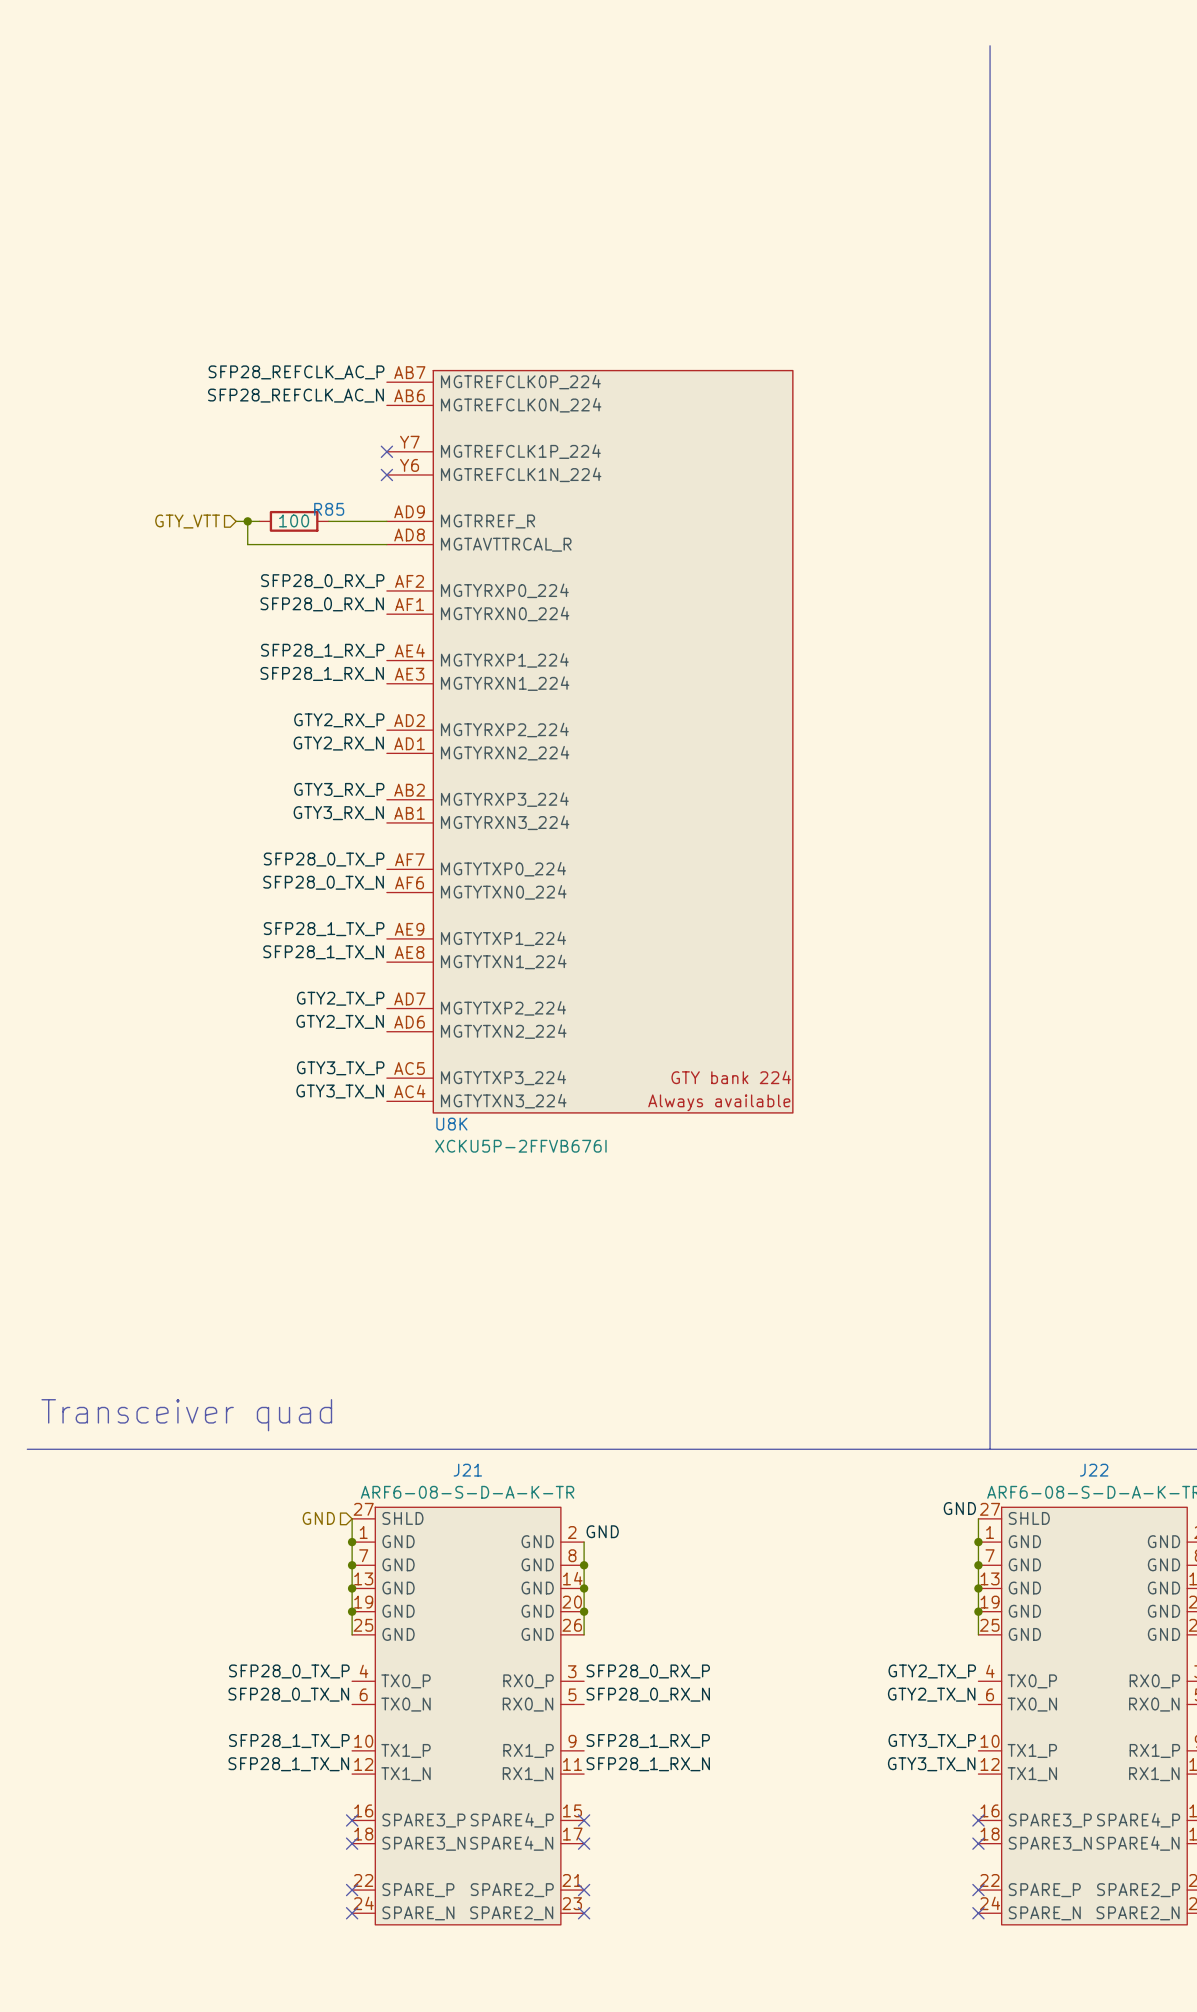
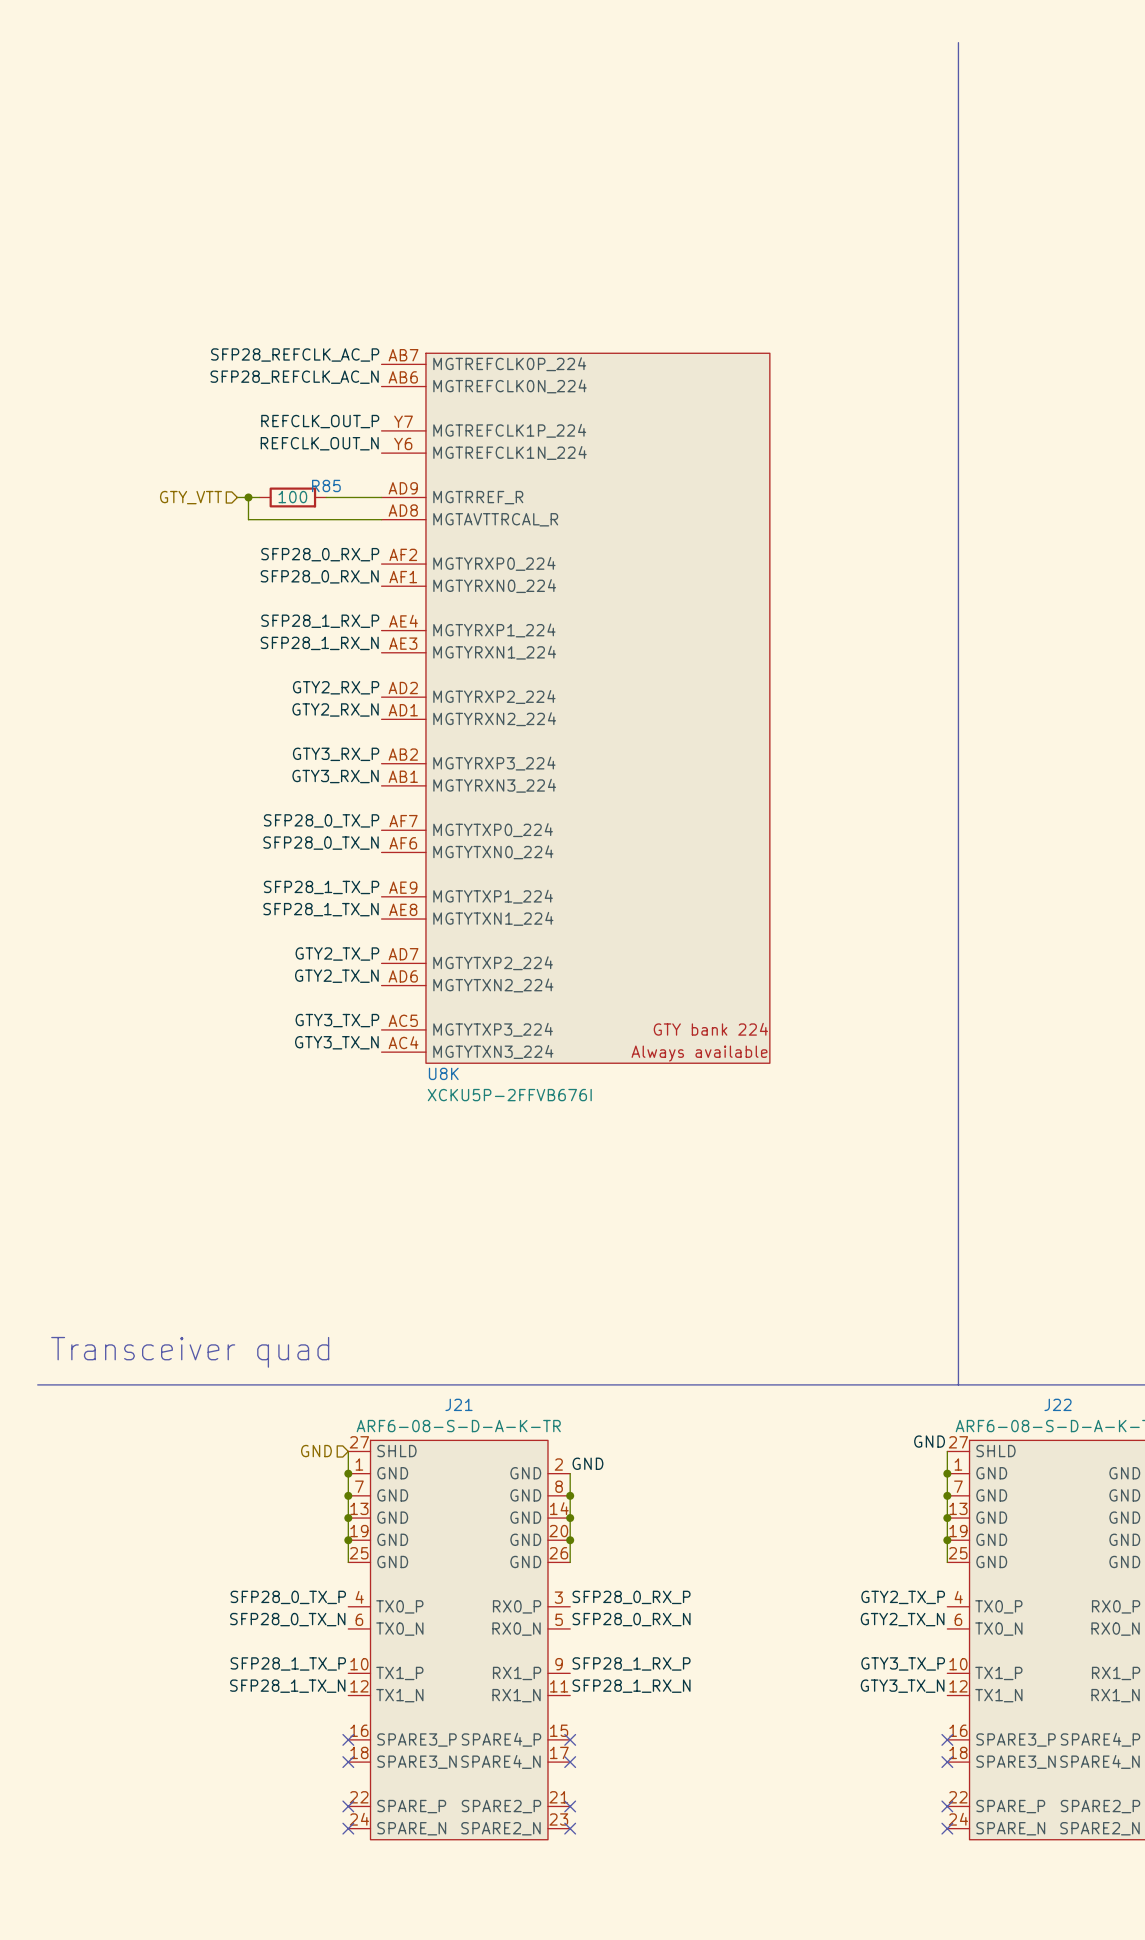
label: none -> REFCLK_OUT_P (320, 421)
no-connect mark: (386, 451) -> none
label: none -> REFCLK_OUT_N (319, 443)
no-connect mark: (386, 474) -> none

